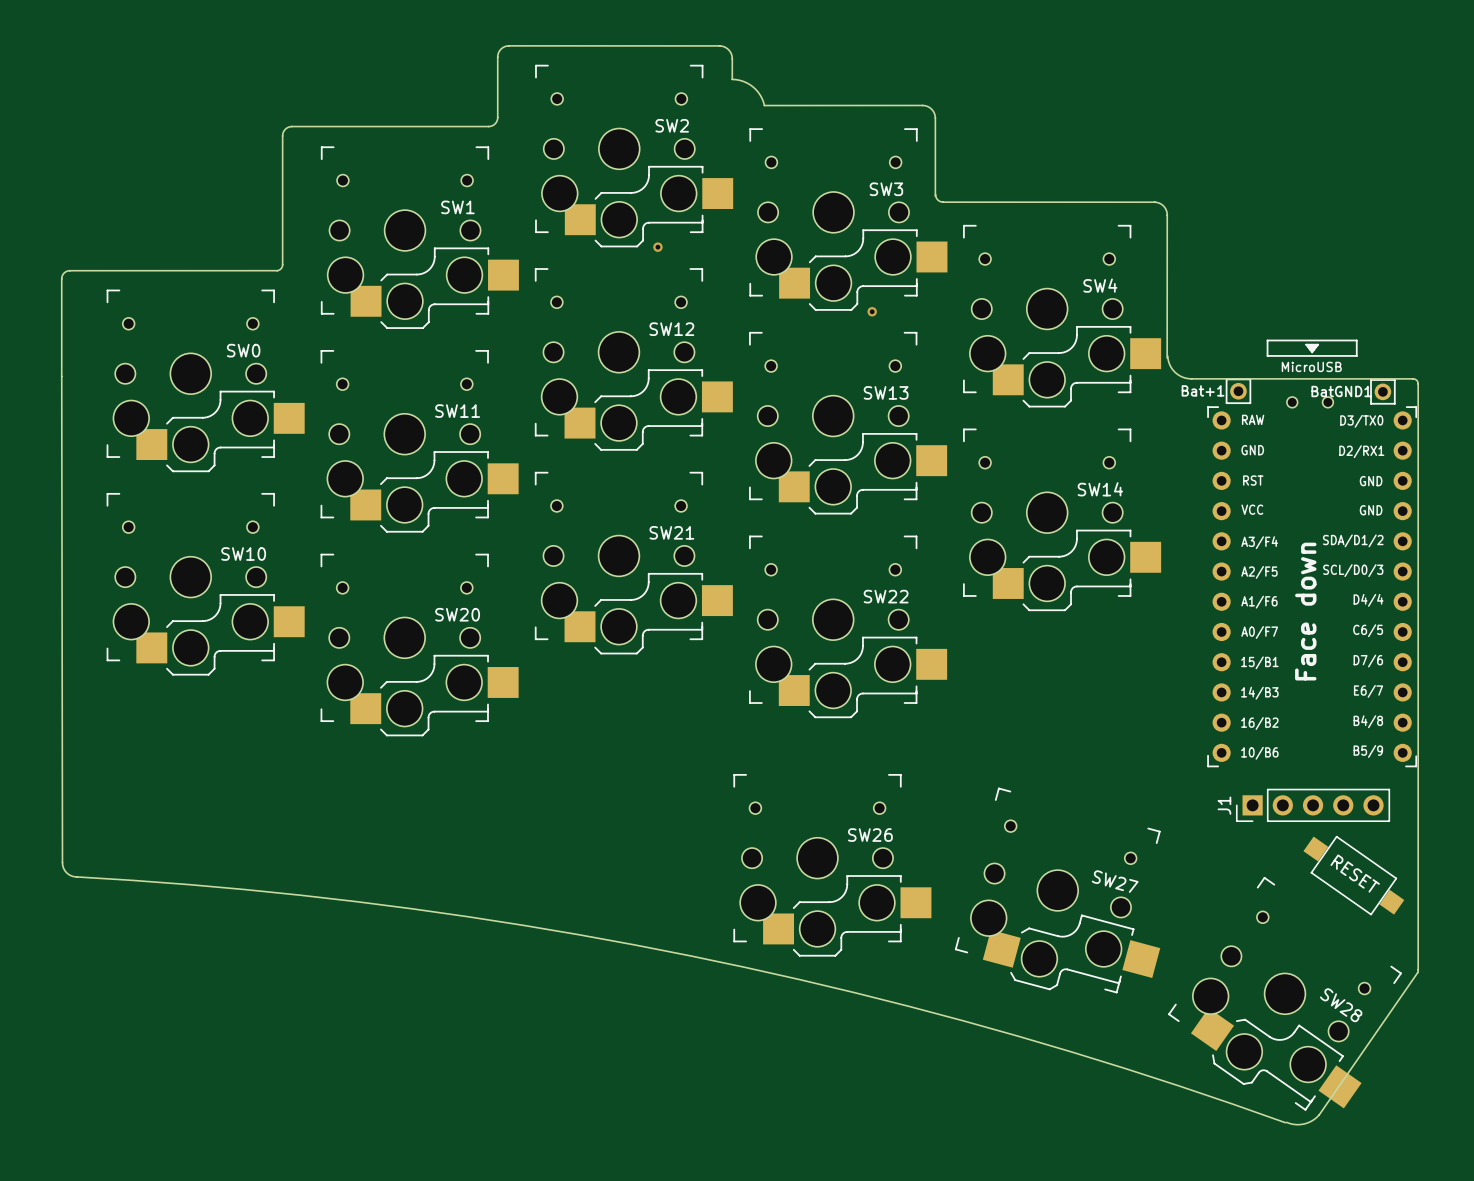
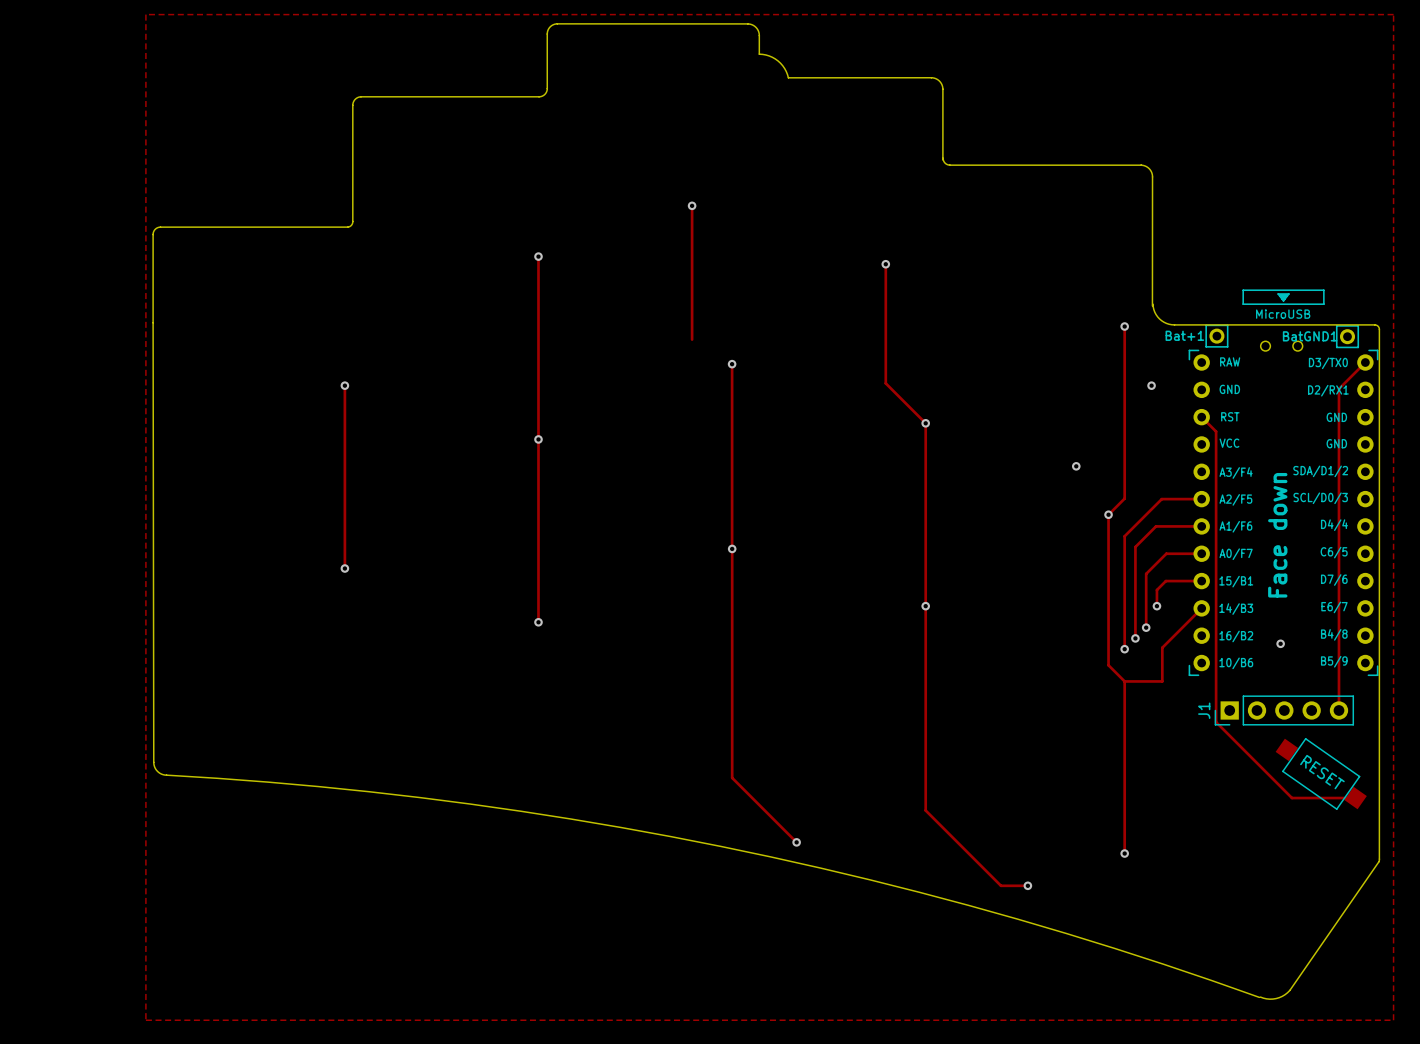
zone outline: none -> (145, 14) (145, 1020) (1393, 1020) (1393, 14) (145, 14)
SW2: (634, 156) -> none
SW3: (848, 219) -> none
SW1: (419, 237) -> none
track: none -> (692, 205) (692, 339)
track: none -> (538, 256) (538, 622)
via: none -> (538, 256)
track: none -> (885, 264) (885, 383) (925, 423) (925, 810) (1000, 885) (1027, 885)
SW4: (1062, 316) -> none
SW12: (633, 359) -> none
SW0: (205, 380) -> none
track: none -> (1124, 326) (1124, 498) (1108, 514) (1108, 665) (1124, 681)
via: none -> (1124, 326)
track: none -> (1365, 362) (1338, 388) (1338, 710)
track: none -> (732, 364) (732, 548)
via: none -> (732, 364)
SW13: (848, 423) -> none
SW11: (419, 441) -> none
track: none -> (344, 385) (344, 568)
via: none -> (344, 385)
via: none -> (1151, 385)
track: none -> (1201, 417) (1216, 431) (1216, 722) (1291, 798) (1355, 798)
via: none -> (925, 423)
via: none -> (538, 439)
SW14: (1062, 519) -> none
via: none -> (1076, 466)
SW21: (633, 563) -> none
track: none -> (1201, 499) (1161, 499) (1124, 536) (1124, 649)
SW10: (205, 584) -> none
via: none -> (1108, 514)
track: none -> (1201, 526) (1156, 526) (1135, 547) (1135, 638)
track: none -> (732, 548) (732, 777) (796, 842)
via: none -> (732, 548)
SW22: (848, 626) -> none
track: none -> (1201, 553) (1166, 553) (1146, 573) (1146, 627)
SW20: (419, 645) -> none
via: none -> (344, 568)
track: none -> (1198, 581) (1165, 581) (1156, 590) (1156, 606)
via: none -> (925, 606)
via: none -> (1156, 606)
track: none -> (1201, 608) (1162, 647) (1162, 681) (1124, 681)
via: none -> (538, 622)
via: none -> (1146, 627)
via: none -> (1135, 638)
via: none -> (1280, 643)
via: none -> (1124, 649)
track: none -> (1124, 681) (1124, 853)
SW26: (832, 865) -> none
SW27: (1057, 890) -> none
via: none -> (796, 842)
via: none -> (1124, 853)
SW28: (1285, 993) -> none
via: none -> (1027, 885)

